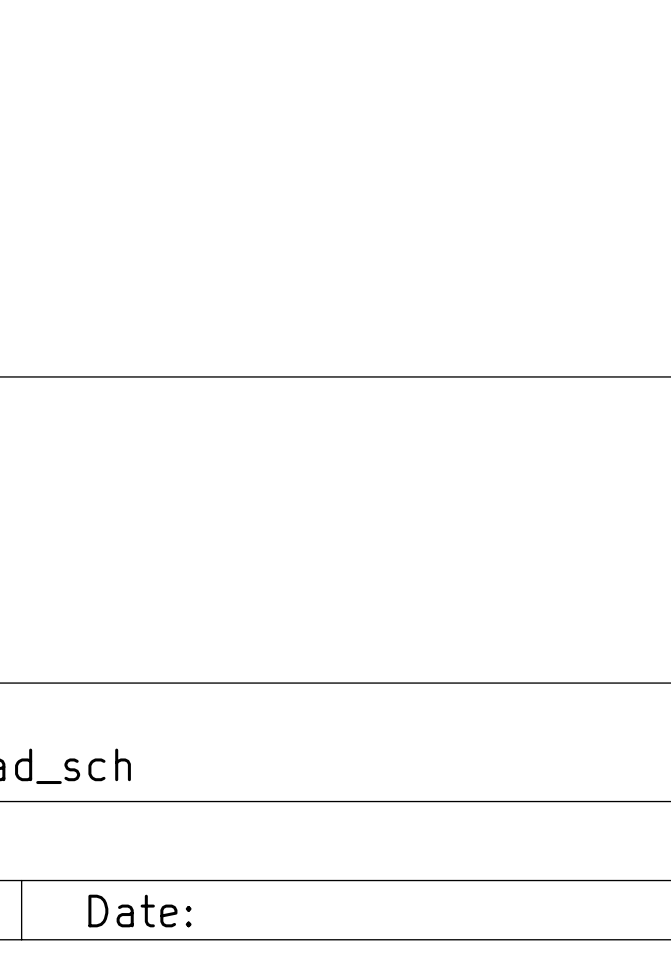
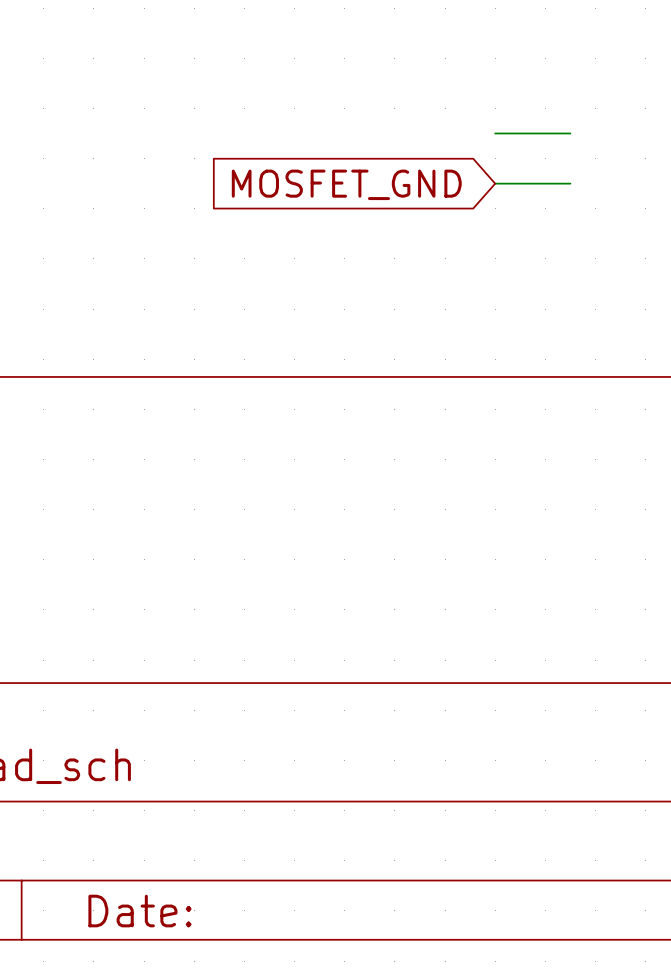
wire: none -> (495, 133) (570, 133)
wire: none -> (495, 183) (570, 183)
global label: none -> MOSFET_GND (346, 184)

